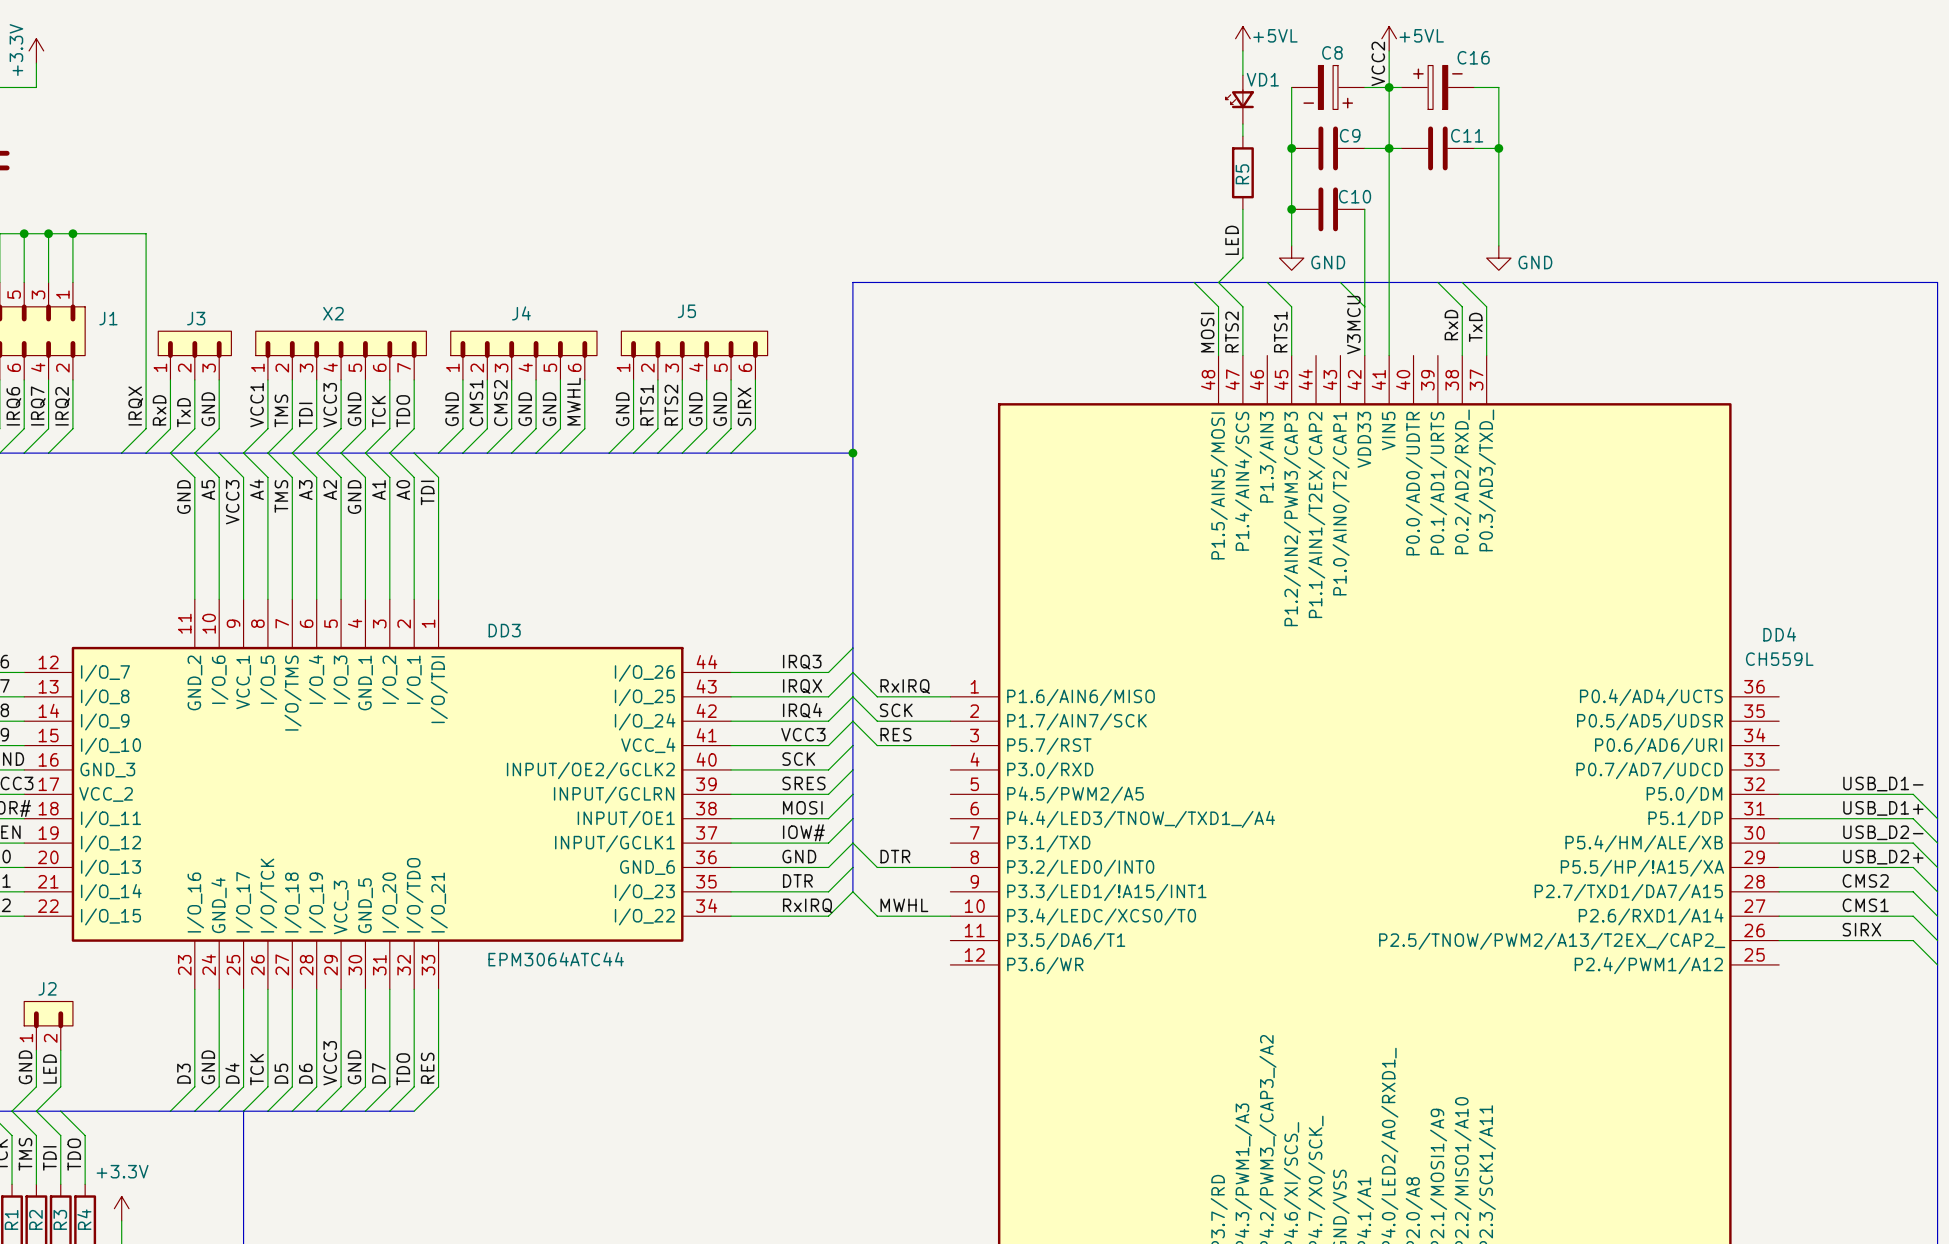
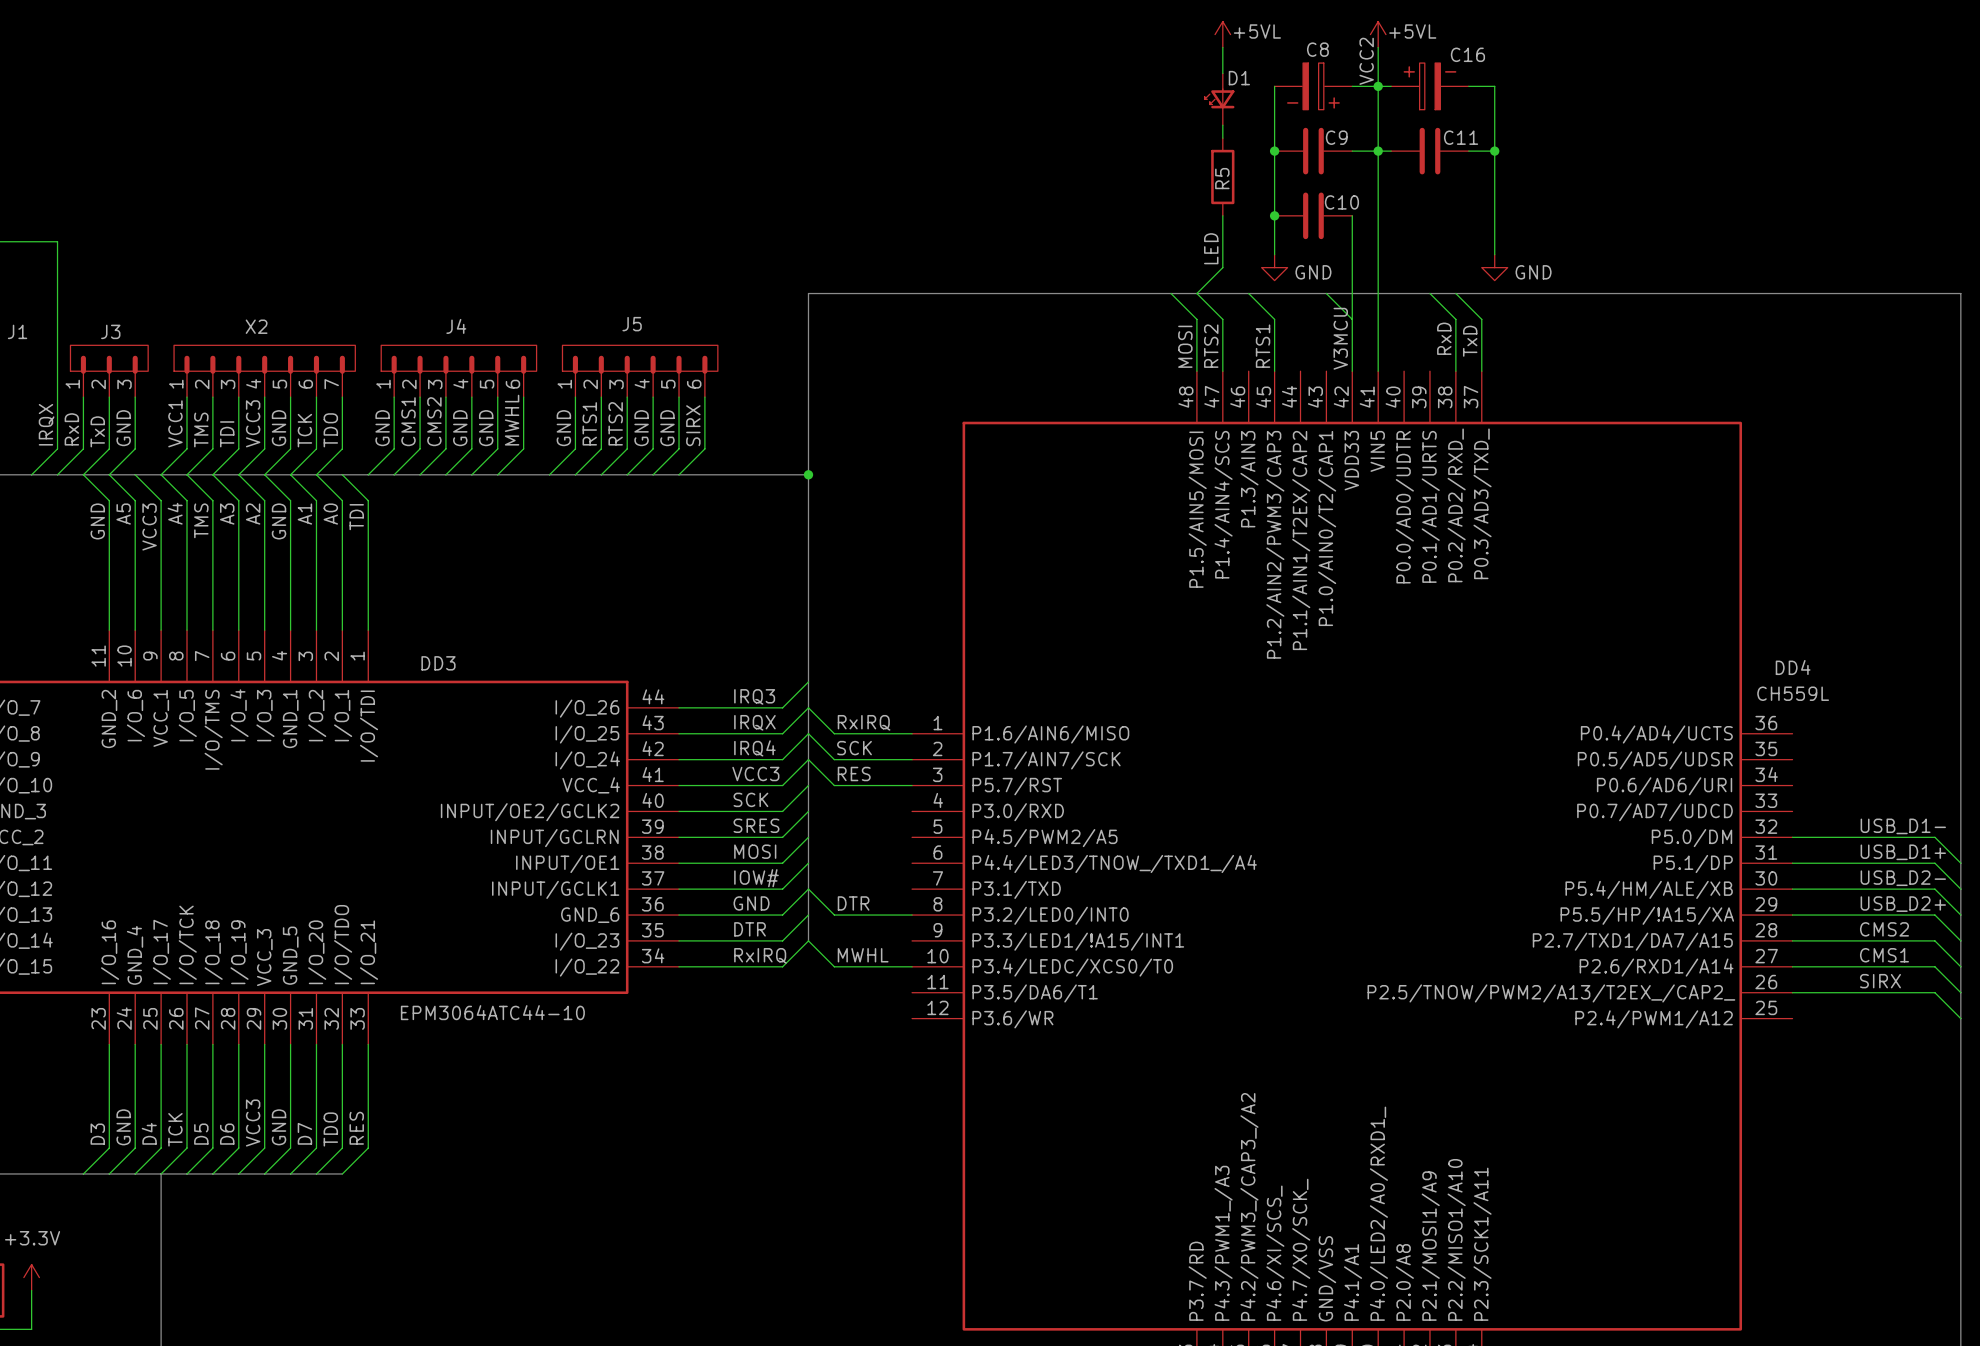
VD1 name: VD1 (1262, 79) -> D1 (1239, 78)
DD3 value: EPM3064ATC44 (556, 959) -> EPM3064ATC44-10 (492, 1012)

